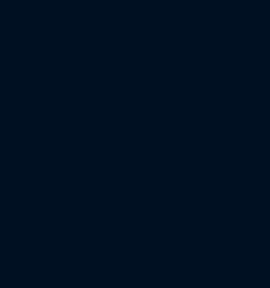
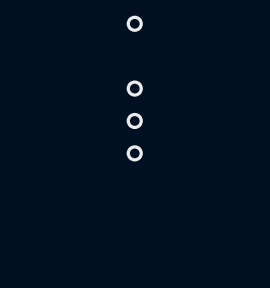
via: none -> (134, 23)
via: none -> (134, 88)
via: none -> (134, 120)
via: none -> (134, 153)

